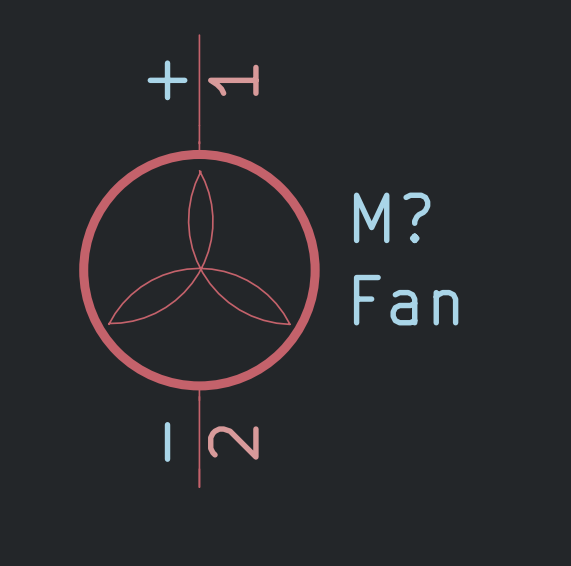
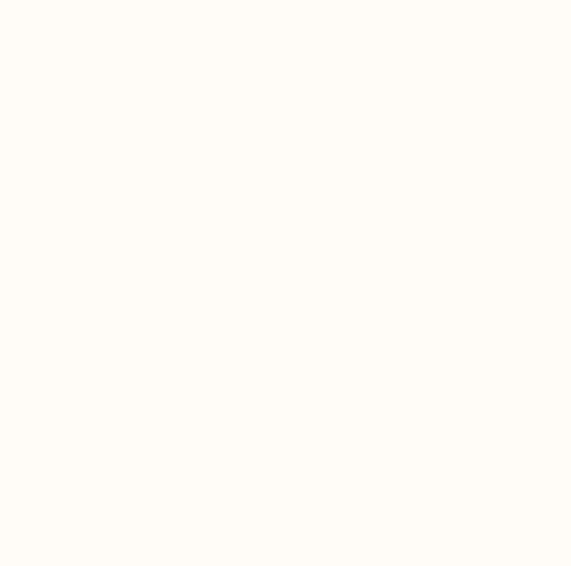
M?: Fan (199, 261) -> none

